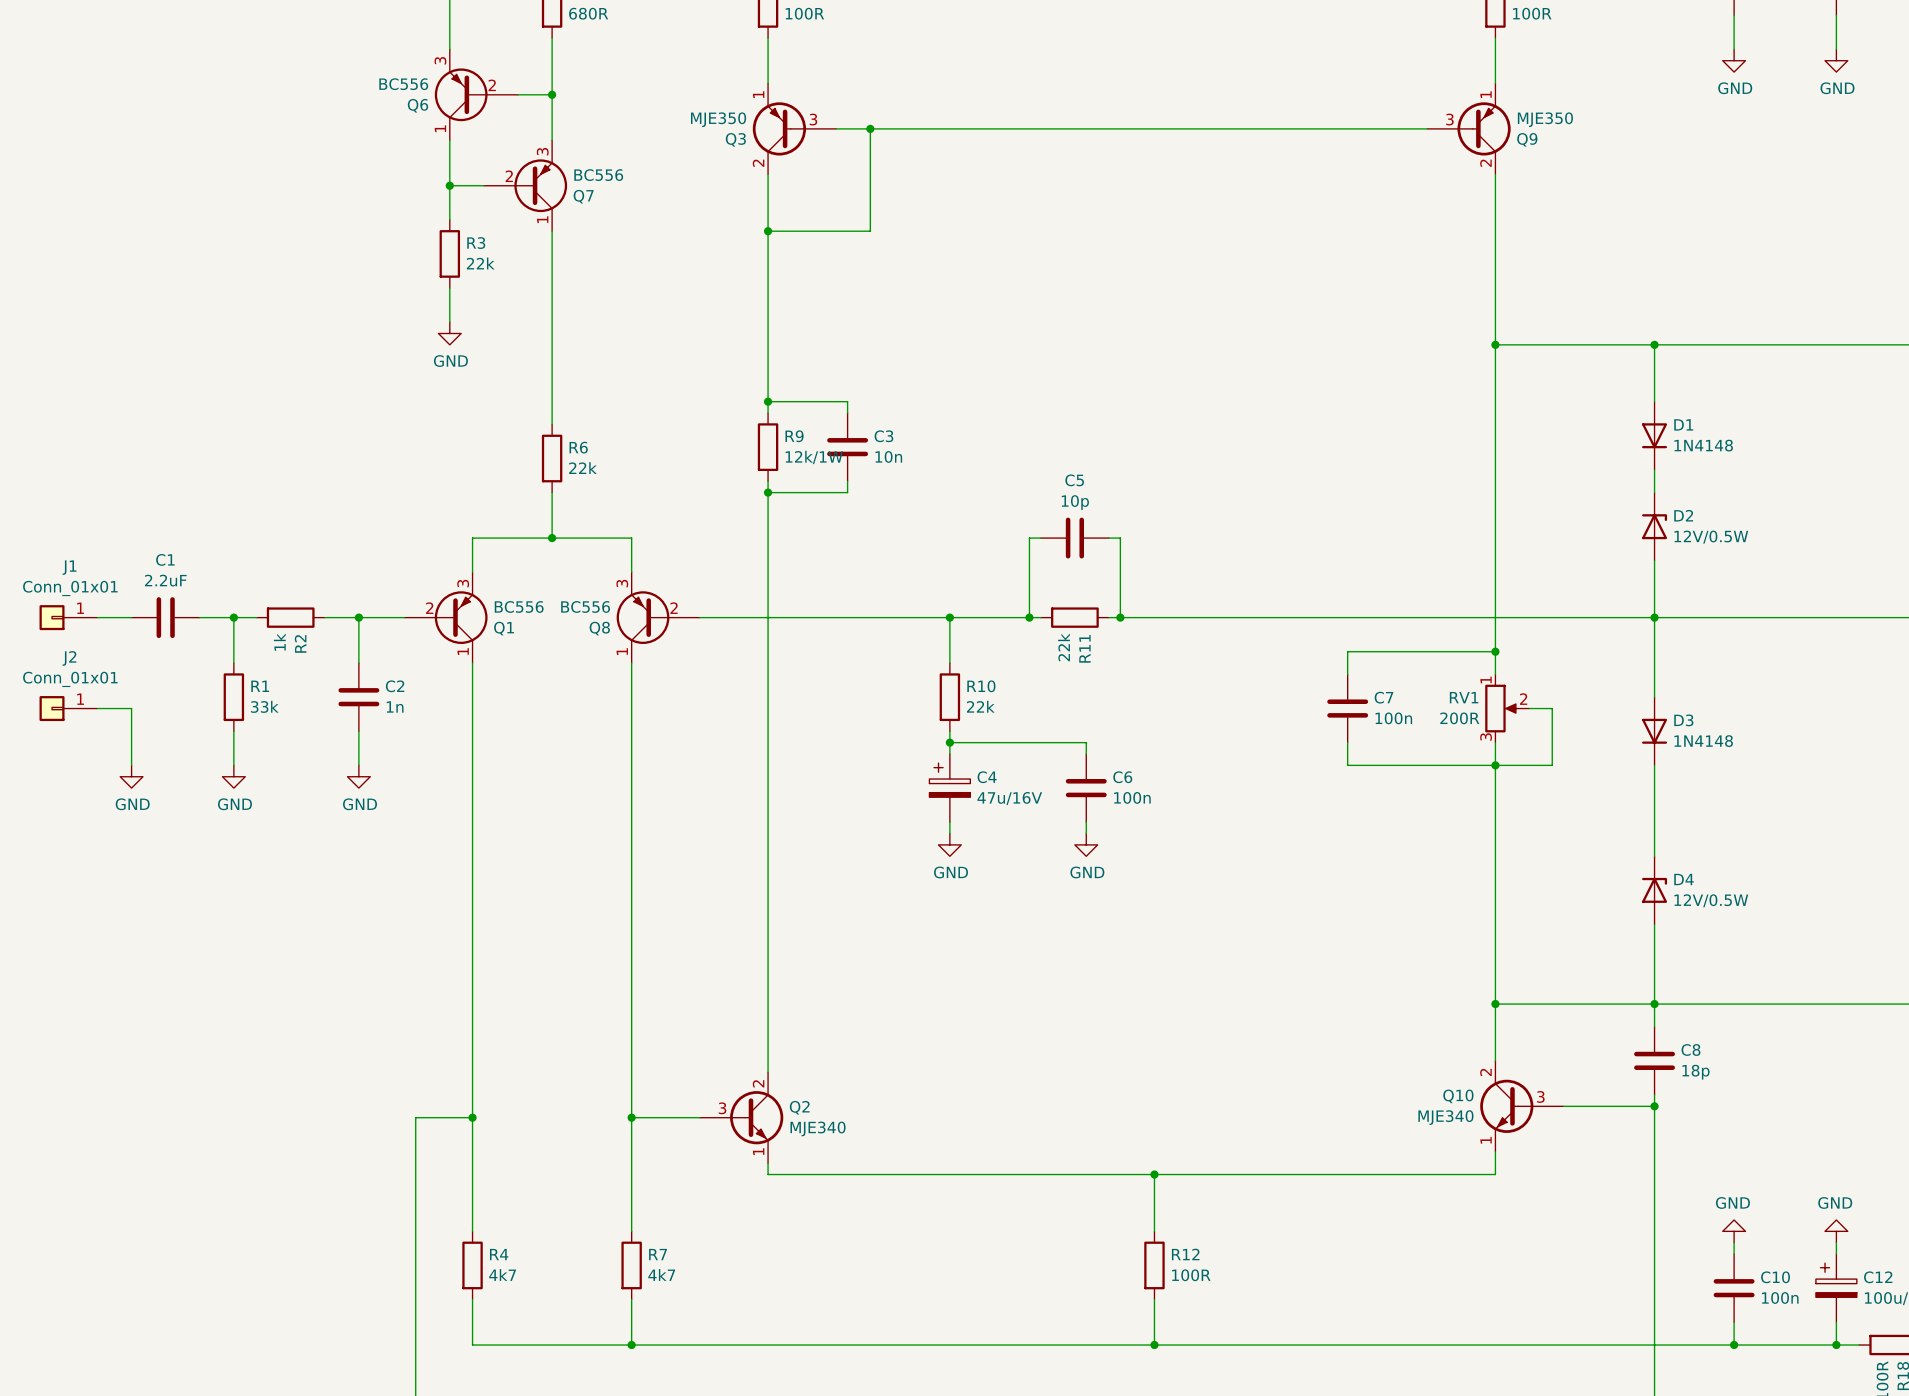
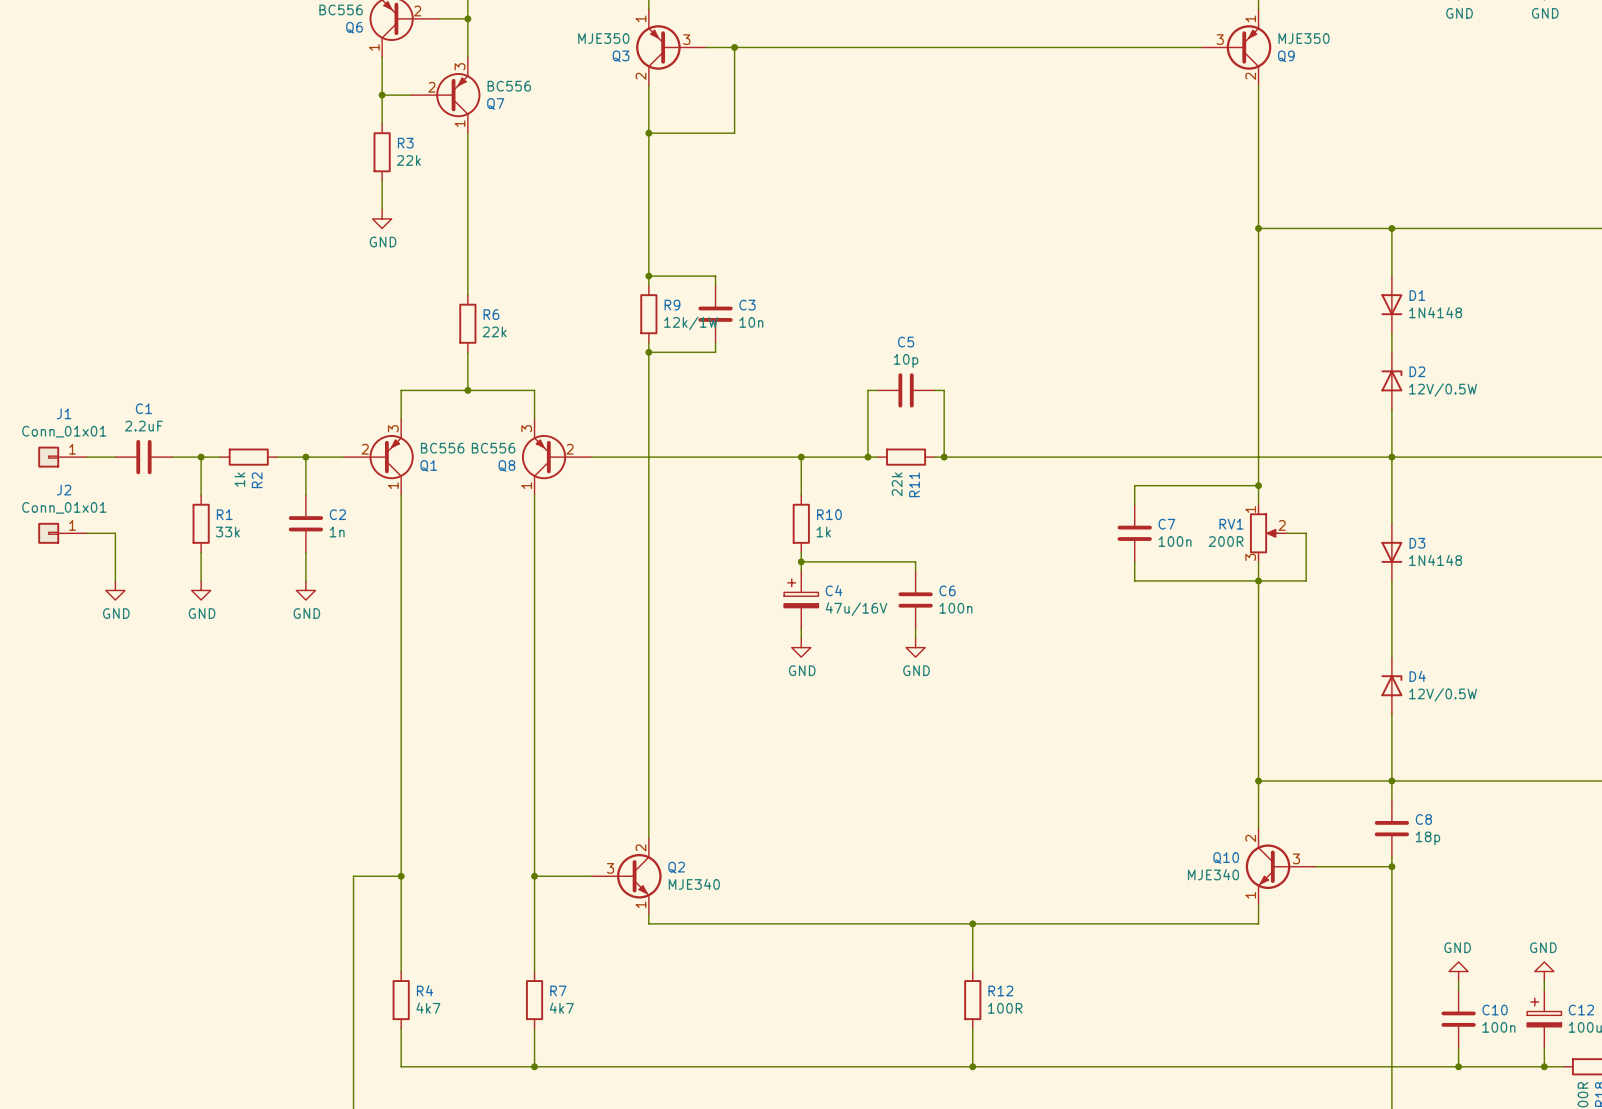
R10 value: 22k (980, 706) -> 1k (823, 532)

